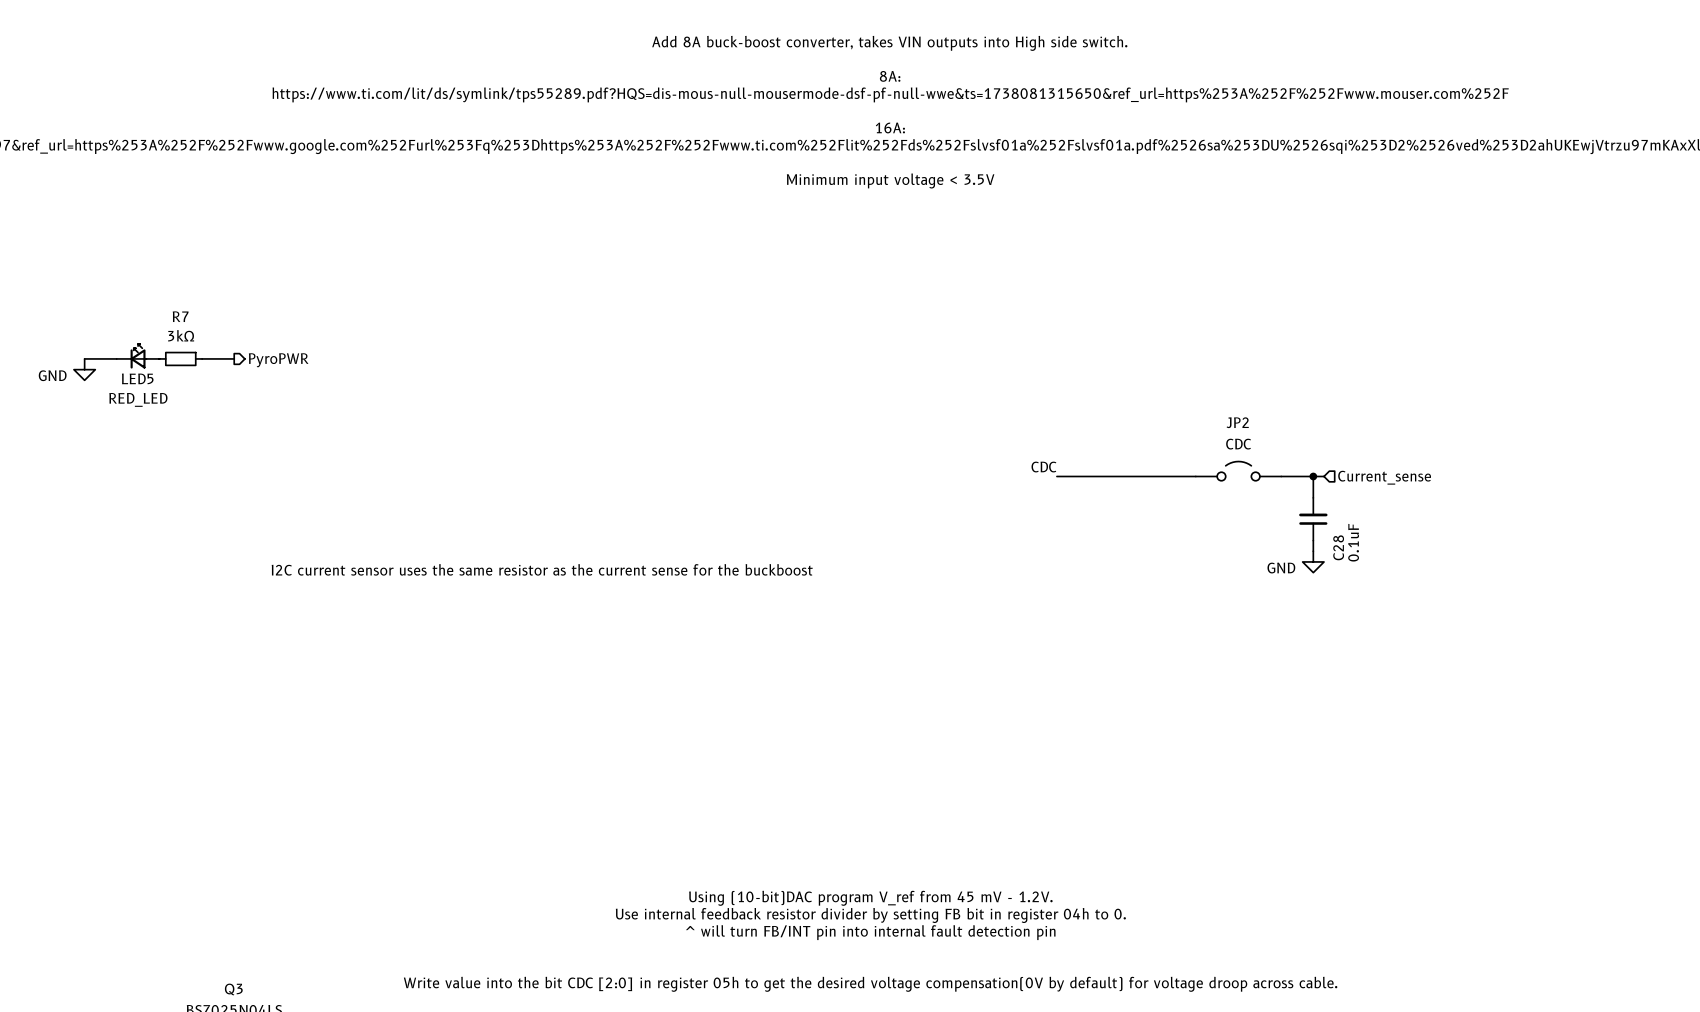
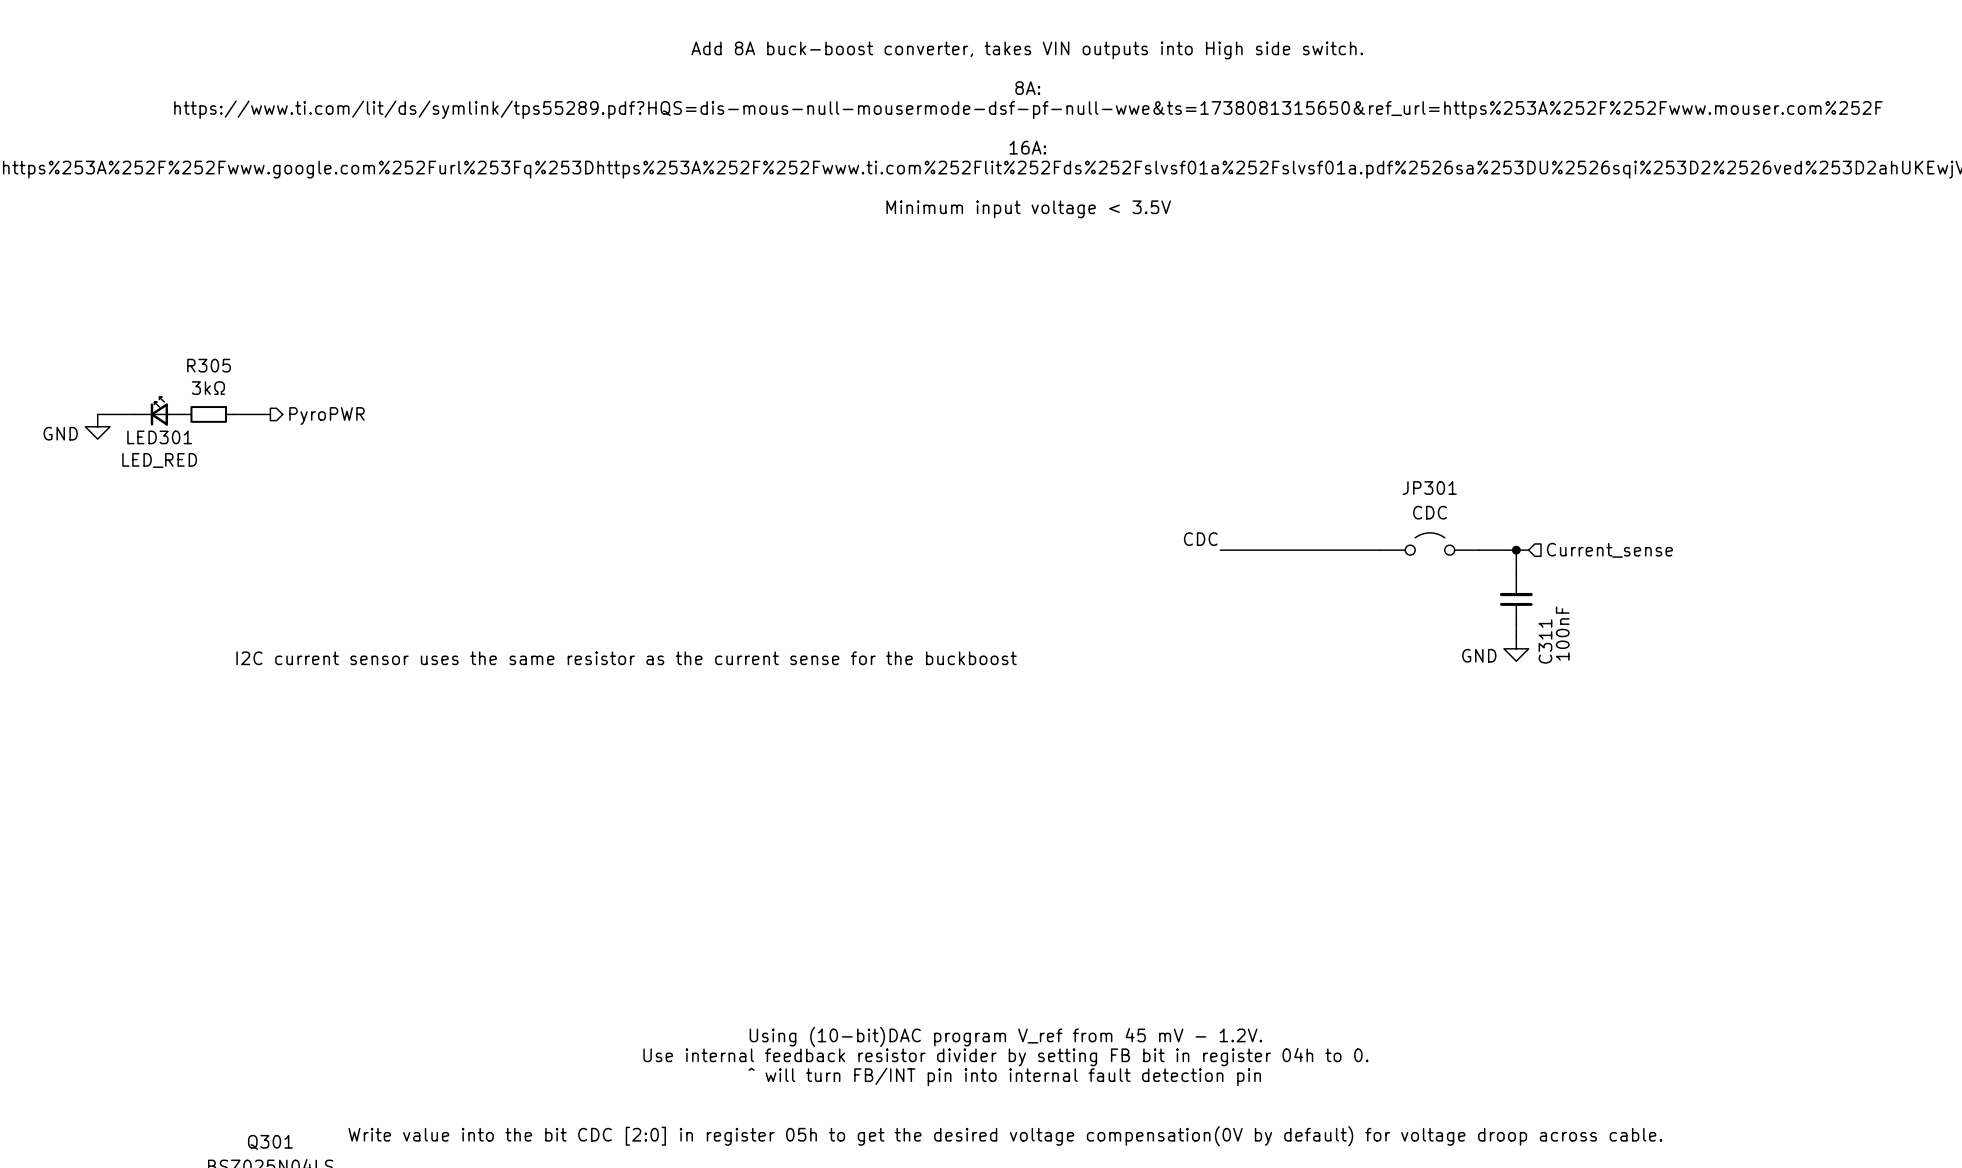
R7 name: R7 (180, 316) -> R305 (209, 365)
LED5 name: LED5 (137, 378) -> LED301 (159, 437)
LED5 value: RED_LED (138, 399) -> LED_RED (159, 460)
JP2 name: JP2 (1237, 422) -> JP301 (1429, 488)
C28 value: 0.1uF (1353, 542) -> 100nF (1562, 633)
C28 name: C28 (1338, 547) -> C311 (1545, 641)
Q3 name: Q3 (233, 989) -> Q301 (270, 1142)

